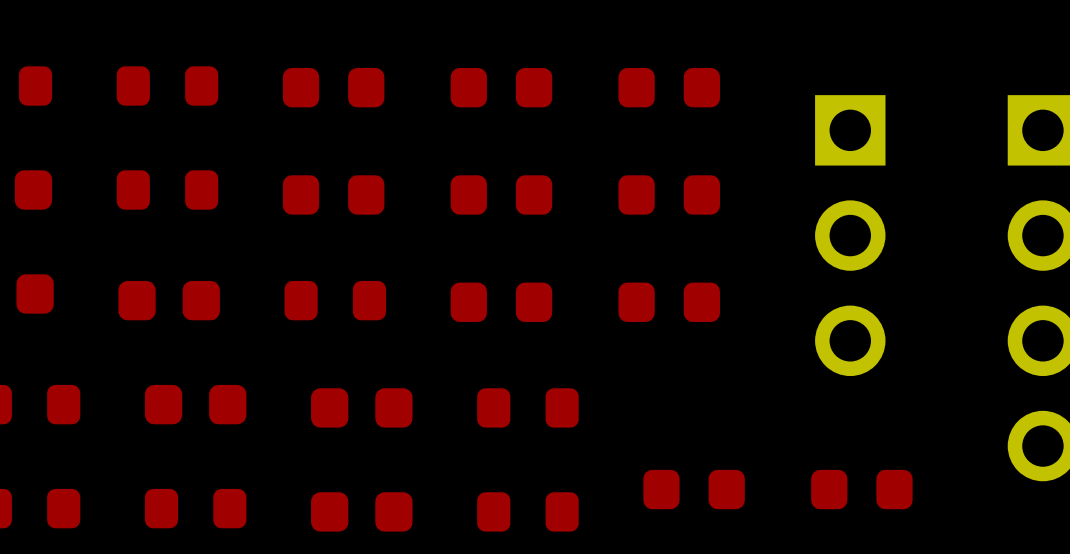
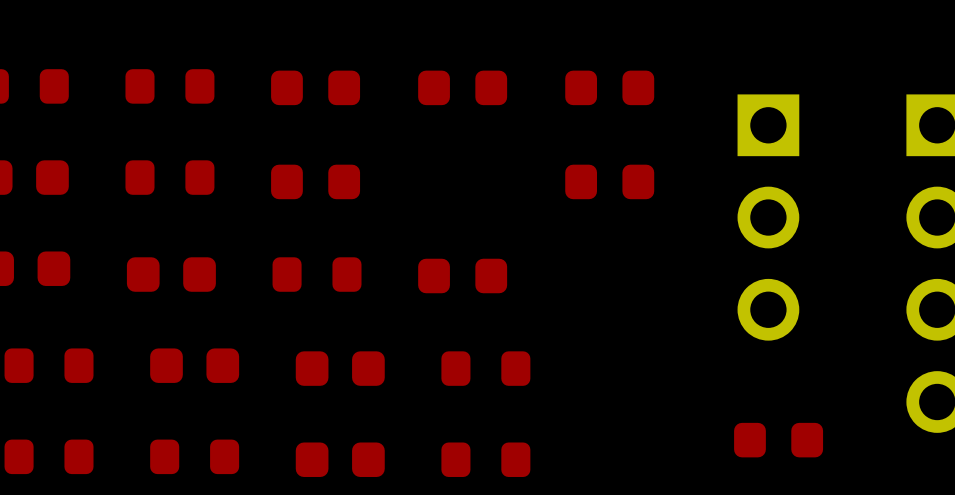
part: (501, 194) -> none
part: (669, 302) -> none
part: (694, 489) -> none

